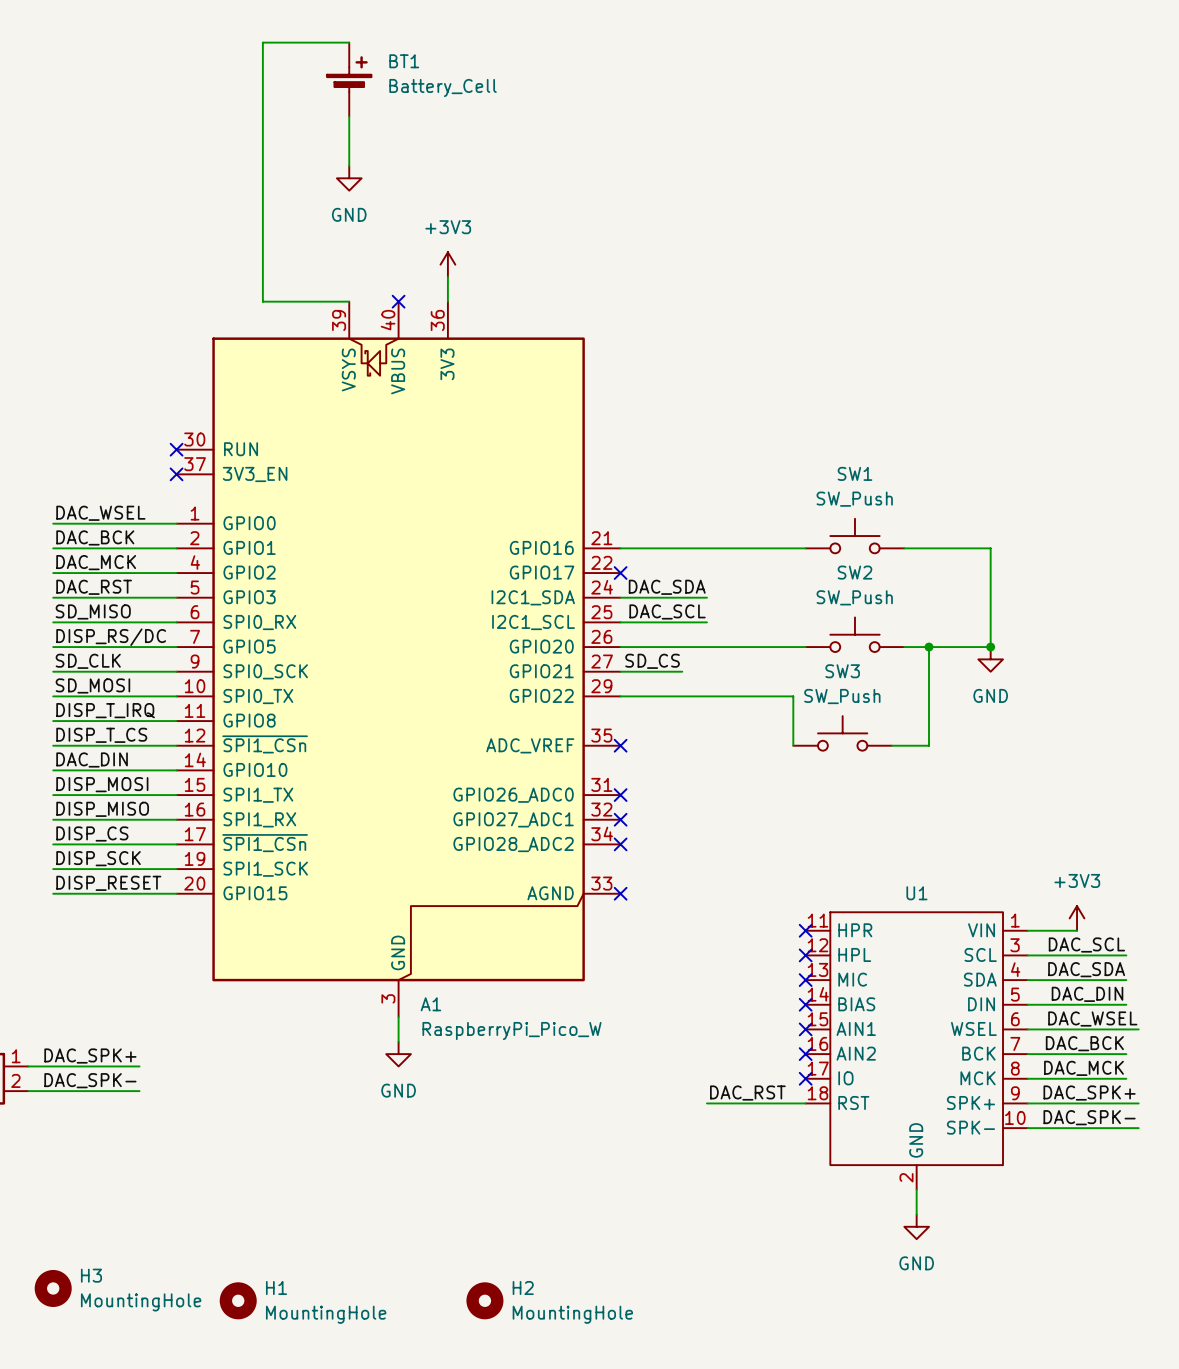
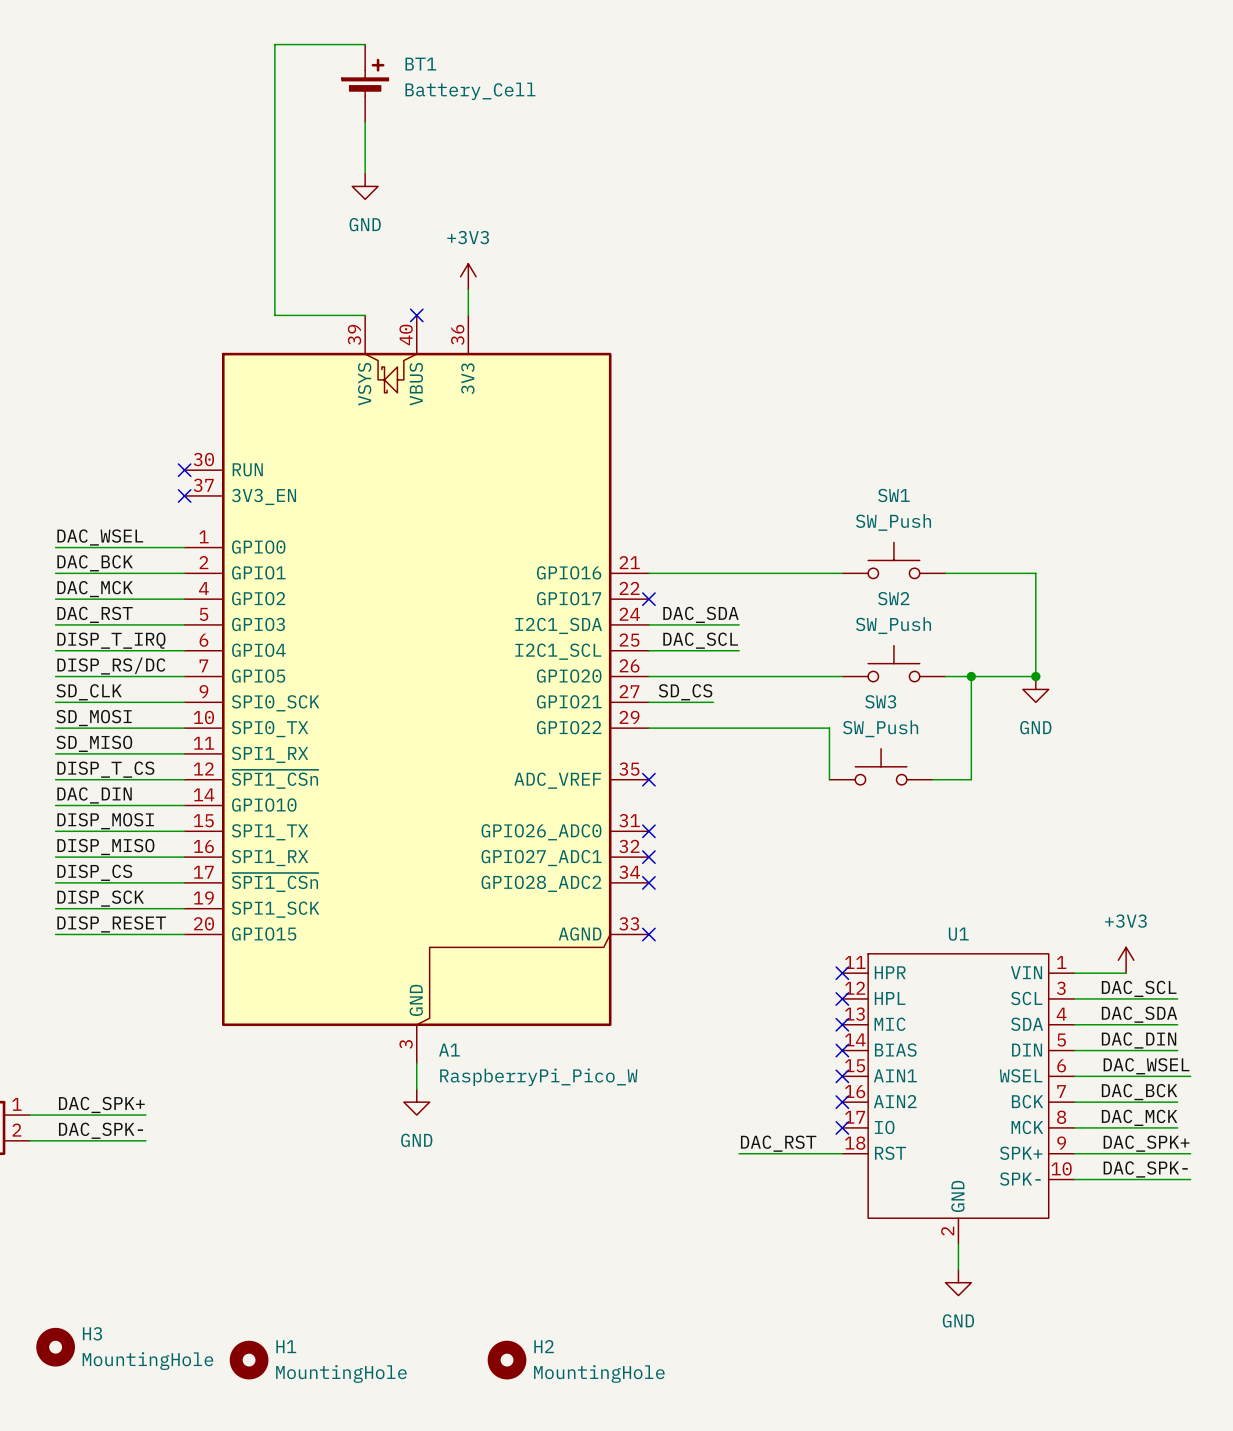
label: SD_MISO (93, 611) -> DISP_T_IRQ (111, 640)
A1 pin name: SPI0_RX (259, 622) -> GPIO4 (258, 650)
label: DISP_T_IRQ (105, 710) -> SD_MISO (94, 743)
A1 pin name: GPIO8 (249, 720) -> SPI1_RX (270, 754)

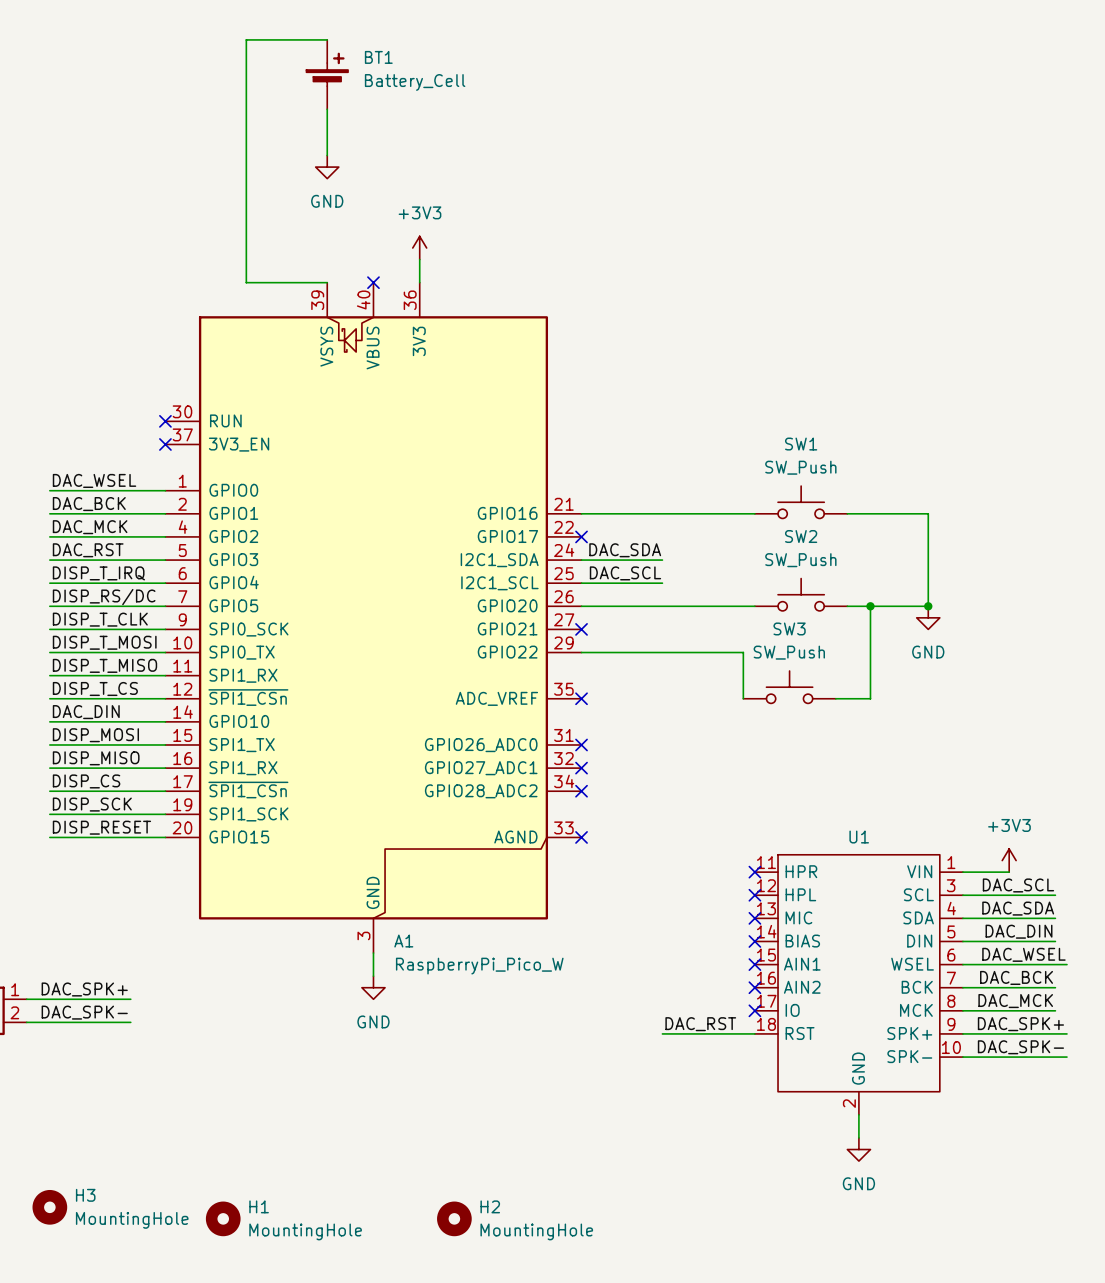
label: SD_CLK (89, 692) -> DISP_T_CLK (100, 619)
label: SD_CS (685, 692) -> none
wire: (648, 702) (713, 702) -> none
no-connect mark: none -> (581, 629)
label: SD_MOSI (94, 718) -> DISP_T_MOSI (104, 642)
label: SD_MISO (94, 743) -> DISP_T_MISO (104, 665)

